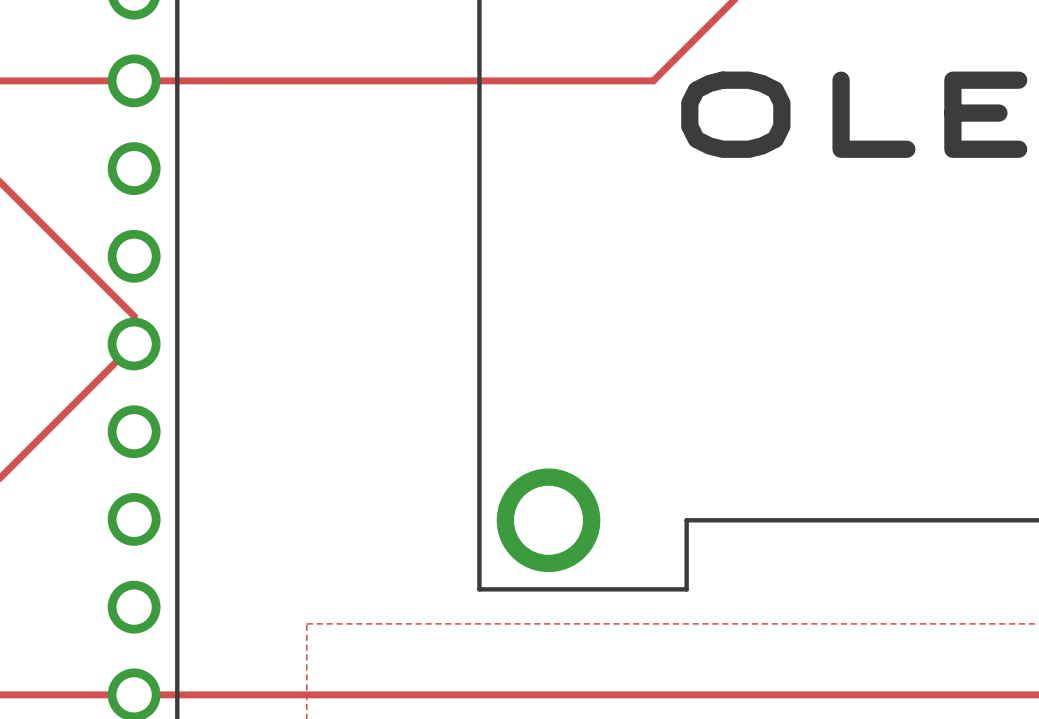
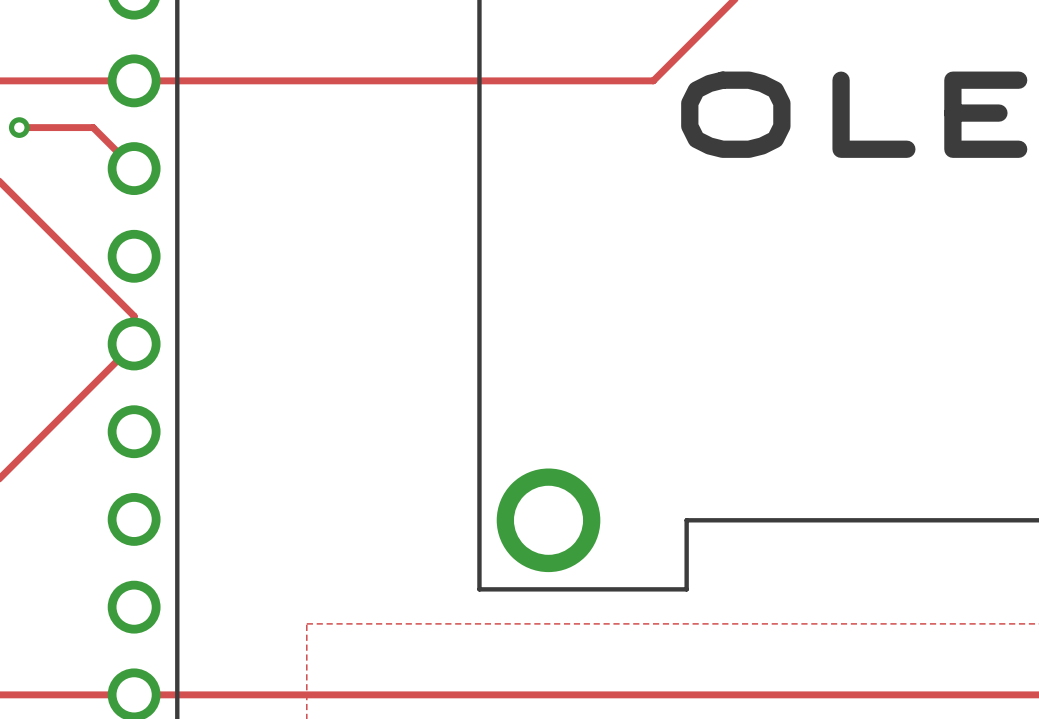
track: none -> (19, 127) (93, 127) (134, 168)
via: none -> (19, 127)

